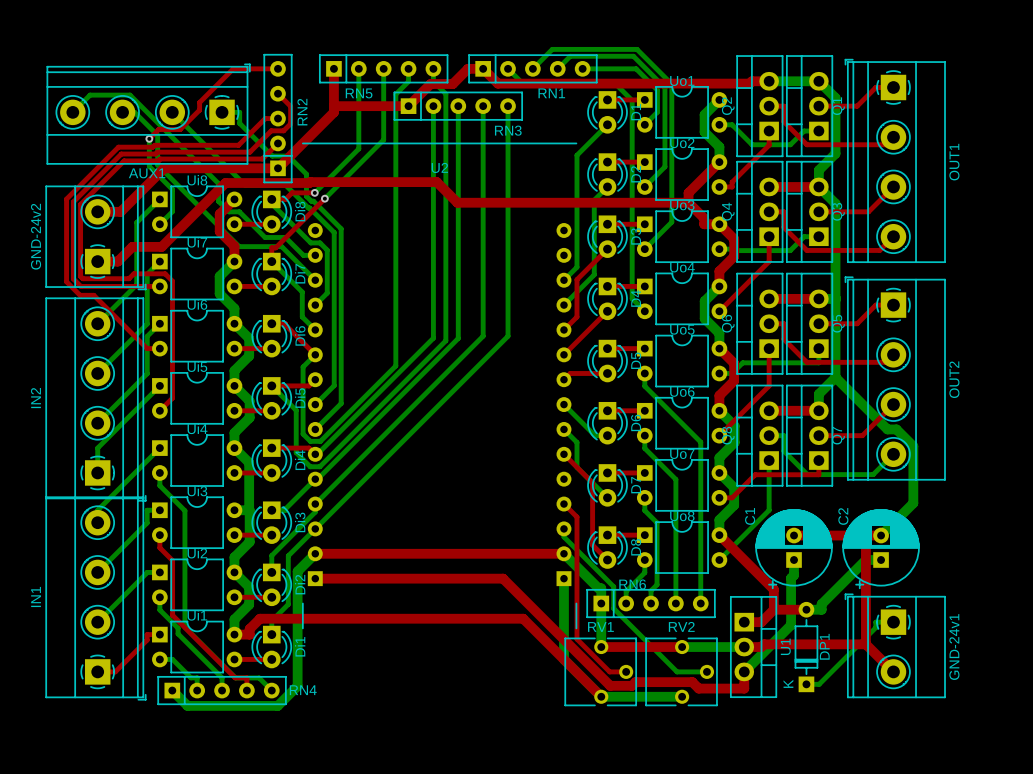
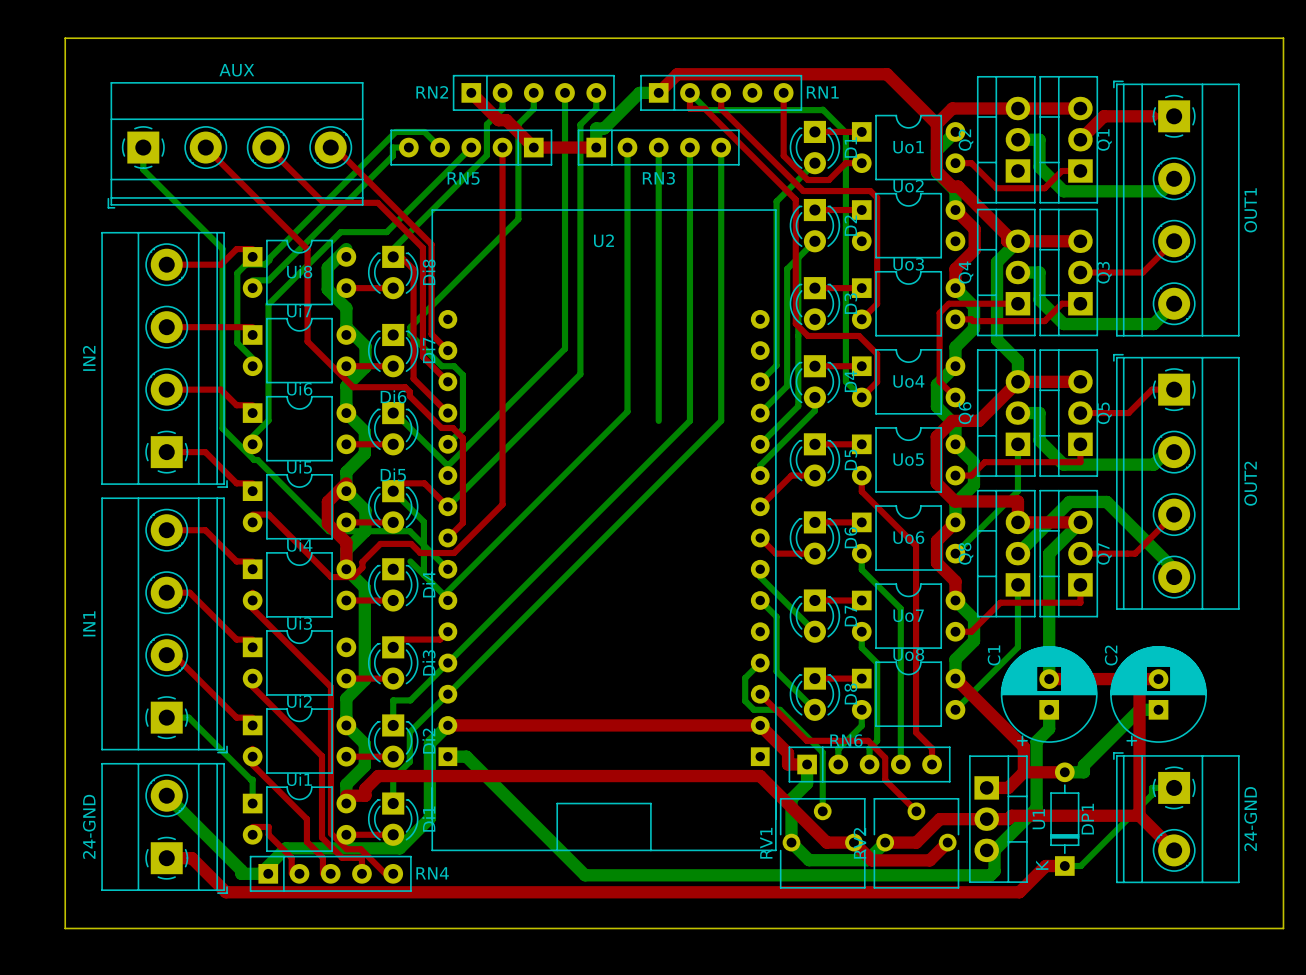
board edge: none -> (65, 38) (1283, 38) (1283, 928) (65, 928) (65, 38)
top track: (278, 68) (233, 68) (199, 102) (199, 110) (180, 129) (158, 129) (149, 138) -> none
top track: (333, 68) (333, 112) (278, 168) (164, 168) (120, 211) (97, 211) -> (471, 92) (498, 120) (506, 120) (533, 147) (596, 147)
bottom track: none -> (658, 92) (639, 92) (604, 128) (596, 128) (596, 139)
top track: none -> (658, 92) (677, 74) (887, 74) (936, 124)
top track: none -> (689, 92) (689, 108) (704, 108) (795, 199) (795, 323) (807, 335) (859, 335) (877, 354) (877, 382) (861, 397)
bottom track: (532, 68) (552, 49) (637, 49) (671, 84) (671, 222) (644, 249) -> none
top track: none -> (721, 92) (721, 108) (803, 191) (870, 191) (877, 197) (877, 303) (861, 319)
bottom track: (557, 68) (570, 56) (633, 56) (664, 87) (664, 166) (644, 186) -> none
bottom track: (582, 68) (636, 68) (657, 90) (657, 112) (644, 124) -> none
top track: none -> (783, 92) (783, 155) (807, 180) (828, 180) (845, 163) (861, 163)
Uo1 name position: Uo1 (682, 80) -> Uo1 (908, 147)
bottom track: (358, 81) (358, 148) (314, 192) -> (502, 108) (486, 124) (486, 155) (393, 249)
bottom track: (383, 81) (383, 139) (324, 198) -> (533, 108) (518, 124) (518, 219) (410, 327) (410, 334) (441, 366) (454, 366) (462, 375) (462, 429) (447, 444)
bottom track: (408, 81) (395, 94) (395, 365) (320, 441) (310, 441) (303, 434) (303, 367) (315, 354) -> (565, 108) (565, 348) (447, 465) (447, 475)
bottom track: (433, 81) (445, 94) (445, 340) (319, 466) (310, 466) -> (596, 108) (580, 124) (580, 374) (447, 506)
top track: (752, 81) (749, 83) (497, 83) (483, 68) (467, 68) (452, 84) (430, 84) (408, 106) (333, 106) -> (996, 108) (952, 108) (936, 124)
bottom track: (769, 81) (818, 81) (835, 97) (835, 153) (818, 170) (818, 186) (835, 203) (835, 298) -> none
top track: none -> (1017, 108) (1080, 108)
top track: (875, 87) (857, 106) (818, 106) -> (1152, 116) (1103, 116) (1080, 139)
top track: (278, 93) (290, 106) (290, 123) (283, 130) (271, 130) (249, 152) (121, 154) (73, 201) (73, 278) (80, 286) (159, 286) -> none
RN5 name position: RN5 (359, 93) -> RN5 (463, 178)
RN1 name position: RN1 (551, 93) -> RN1 (822, 92)
top track: none -> (936, 124) (936, 171) (952, 186) (958, 186) (1007, 235) (1007, 241) (1017, 241)
RN3 position: (458, 106) -> (658, 147)
bottom track: none -> (1017, 139) (1039, 139) (1039, 167) (1063, 191) (1161, 191) (1174, 178)
top track: (769, 106) (783, 106) (783, 121) (806, 144) (885, 144) (893, 137) -> none
AUX: none -> (235, 145)
bottom track: (72, 112) (90, 95) (130, 95) (218, 183) (218, 201) (229, 211) (239, 211) (265, 237) (285, 237) (303, 255) (315, 255) -> (143, 147) (143, 169) (222, 248) (222, 428) (254, 459) (257, 459) (328, 531) (409, 531) (447, 569)
bottom track: (122, 112) (134, 112) (157, 135) (157, 165) (239, 246) (281, 246) (315, 280) -> none
top track: none -> (205, 147) (307, 249) (307, 341) (353, 387) (405, 387) (409, 391) (409, 396) (441, 427) (452, 427) (462, 438) (462, 523) (447, 538)
bottom track: (172, 112) (245, 185) (285, 185) (334, 232) (334, 385) (315, 404) -> none
top track: none -> (268, 147) (323, 202) (377, 202) (422, 247) (422, 356) (447, 381)
bottom track: (222, 112) (239, 112) (239, 123) (272, 156) (288, 156) (306, 174) (306, 196) (341, 228) (341, 403) (315, 429) -> none
top track: none -> (330, 147) (334, 147) (431, 244) (431, 334) (447, 350)
bottom track: none -> (408, 147) (392, 147) (392, 156) (268, 280) (252, 280)
RN2 name position: RN2 (302, 112) -> RN2 (432, 92)
bottom track: none -> (440, 147) (424, 131) (395, 131) (265, 264) (245, 264) (237, 273) (237, 343) (252, 358)
bottom track: none -> (471, 147) (386, 232) (340, 232) (268, 304) (268, 420) (252, 436)
top track: none -> (502, 147) (502, 504) (454, 553) (420, 553) (411, 543) (380, 543) (362, 561) (362, 567) (353, 577) (331, 577) (268, 514) (252, 514)
bottom track: (433, 112) (433, 338) (315, 454) -> none
AUX1: (148, 114) -> none
top track: (278, 118) (265, 118) (238, 145) (118, 147) (66, 199) (66, 281) (80, 295) (93, 295) (147, 348) (159, 348) -> none
RN2 rotation: 0° (278, 118) -> 90° counterclockwise (471, 147)
bottom track: (719, 124) (732, 124) (752, 144) (790, 144) (804, 131) (818, 131) -> none
top track: none -> (955, 163) (971, 163) (996, 188) (1044, 188) (1061, 170) (1080, 170)
RN3 name position: RN3 (508, 130) -> RN3 (658, 178)
top track: (769, 131) (769, 145) (732, 182) (732, 186) (719, 186) -> none
bottom track: (149, 138) (149, 166) (172, 189) (172, 211) (159, 224) -> none
via: (149, 138) -> none
U2 footprint: [302, 142, 578, 629] -> [431, 209, 777, 852]
top track: (278, 143) (262, 159) (124, 160) (80, 204) (80, 276) (82, 278) (129, 278) (133, 273) (165, 273) (172, 281) (172, 398) (159, 410) -> none
top track: (719, 162) (688, 192) (688, 202) -> (955, 210) (974, 229) (974, 249) (955, 269) (955, 288)
Ui8 name position: Ui8 (197, 180) -> Ui8 (299, 271)
bottom track: none -> (1017, 241) (997, 262) (997, 339) (1017, 360) (1017, 381)
top track: (314, 192) (292, 192) (285, 199) (271, 199) -> none
via: (314, 192) -> none
top track: none -> (252, 249) (236, 249) (221, 264) (166, 264)
top track: none -> (393, 249) (413, 269) (413, 378) (447, 413)
top track: (324, 198) (275, 247) (271, 247) (271, 261) -> none
via: (324, 198) -> none
bottom track: (159, 199) (136, 222) (136, 284) (97, 323) -> none
top track: (234, 199) (219, 214) (219, 231) (234, 246) (234, 261) -> (346, 483) (327, 501) (327, 523) (346, 542) (346, 561)
bottom track: (271, 199) (271, 203) (310, 242) (320, 242) (327, 250) (327, 293) (315, 305) -> none
bottom track: none -> (798, 257) (787, 269) (787, 386) (760, 413)
top track: (688, 202) (457, 202) (436, 182) (225, 183) (161, 246) (132, 246) (117, 261) (97, 261) -> none
top track: (688, 202) (704, 218) (704, 224) (719, 224) (734, 239) (734, 256) (719, 271) (719, 286) -> none
bottom track: none -> (1017, 272) (1039, 272) (1039, 299) (1063, 324) (1153, 324) (1174, 303)
top track: (769, 211) (783, 211) (783, 227) (806, 250) (879, 250) (893, 236) -> none
bottom track: none -> (955, 288) (974, 306) (974, 328) (955, 347) (955, 366)
top track: (769, 236) (769, 261) (719, 311) -> (1017, 303) (948, 303) (939, 313) (939, 381) (955, 397)
bottom track: (818, 236) (804, 236) (790, 250) (719, 249) -> none
top track: none -> (1080, 303) (1061, 303) (1044, 321) (955, 319)
GND-24v2: (95, 237) -> none
top track: (607, 249) (576, 279) (576, 316) (563, 329) -> none
top track: none -> (166, 327) (252, 327)
bottom track: (159, 261) (147, 274) (147, 323) (97, 373) -> none
bottom track: (234, 261) (219, 276) (219, 293) (234, 308) -> (346, 249) (327, 267) (327, 289) (346, 308) (346, 327) (365, 346) (365, 367) (346, 386) (346, 394)
bottom track: (271, 261) (302, 292) (302, 316) (315, 329) -> none
bottom track: (576, 267) (563, 280) -> (776, 342) (776, 365) (760, 381)
Uo4 name position: Uo4 (682, 267) -> Uo4 (908, 381)
bottom track: (594, 274) (563, 305) -> (798, 351) (798, 406) (760, 444)
top track: none -> (1017, 381) (978, 420) (952, 420) (936, 436) (936, 483) (954, 501) (1017, 501) (1017, 522)
bottom track: (818, 298) (836, 298) (835, 377) -> none
top track: none -> (166, 389) (221, 389) (236, 405) (252, 405)
bottom track: none -> (814, 397) (814, 410) (760, 465) (760, 475)
top track: (607, 311) (563, 354) -> none
bottom track: none -> (393, 405) (393, 411) (447, 465)
bottom track: (458, 322) (458, 338) (285, 510) (271, 510) -> (627, 411) (444, 595)
bottom track: (159, 323) (147, 336) (147, 373) (97, 423) -> none
top track: (271, 323) (285, 323) (315, 354) -> none
bottom track: none -> (1017, 413) (1039, 413) (1039, 440) (1063, 464) (1153, 464) (1174, 444)
top track: (769, 323) (783, 323) (783, 339) (806, 362) (885, 362) (893, 354) -> none
bottom track: (483, 329) (483, 336) (315, 504) (315, 512) (271, 555) -> (689, 420) (410, 700) (393, 700) (393, 704)
bottom track: (508, 329) (508, 336) (288, 555) (288, 604) (271, 620) -> (721, 147) (721, 420) (409, 732) (409, 761) (393, 778) (393, 786)
Uo5 name position: Uo5 (682, 329) -> Uo5 (908, 459)
Di6 name rotation: 0° (300, 335) -> 90° clockwise (393, 396)
Di6 name position: Di6 (300, 335) -> Di6 (393, 396)
top track: (719, 348) (734, 363) (734, 380) (719, 395) (719, 410) -> (955, 600) (955, 581) (936, 562) (936, 540) (955, 522)
bottom track: none -> (1017, 444) (1017, 491) (955, 553)
top track: (769, 348) (769, 385) (719, 435) -> none
bottom track: (818, 348) (818, 362) (742, 362) (732, 373) (719, 373) -> none
top track: none -> (1080, 444) (1080, 462) (984, 462) (971, 475) (955, 475)
top track: none -> (166, 452) (205, 452) (236, 483) (252, 483)
top track: (588, 373) (570, 373) (563, 379) -> (791, 475) (760, 506)
bottom track: (644, 373) (644, 386) (700, 442) (700, 603) -> none
top track: none -> (861, 475) (861, 491) (916, 545) (916, 732) (932, 748) (932, 764)
bottom track: (835, 377) (818, 394) (818, 410) -> (1049, 679) (1049, 553) (1080, 522)
bottom track: (835, 377) (887, 429) (896, 429) (913, 446) (913, 503) (881, 535) -> none
top track: none -> (393, 483) (424, 483) (447, 506)
top track: (315, 379) (309, 385) (271, 385) -> (447, 631) (440, 639) (393, 639)
bottom track: (159, 385) (97, 448) (97, 472) -> none
Uo6 name position: Uo6 (682, 391) -> Uo6 (908, 537)
Di5 name rotation: 0° (300, 398) -> 90° clockwise (393, 474)
Di5 name position: Di5 (300, 398) -> Di5 (393, 474)
IN2 position: (95, 399) -> (164, 359)
bottom track: (563, 404) (595, 435) (607, 435) -> none
bottom track: (719, 410) (734, 425) (734, 442) (719, 457) (719, 472) -> (955, 522) (955, 503) (973, 484) (973, 462) (955, 444)
top track: none -> (166, 530) (205, 530) (236, 561) (252, 561)
top track: none -> (760, 538) (775, 553) (814, 553)
bottom track: (563, 429) (576, 442) (576, 467) -> (760, 569) (760, 577) (776, 593)
bottom track: (769, 435) (783, 435) (783, 451) (807, 474) (873, 474) (893, 454) -> (1017, 553) (1069, 501) (1106, 501) (1174, 569)
bottom track: (159, 448) (97, 510) (97, 522) -> none
top track: (271, 448) (309, 448) (315, 454) -> none
top track: (563, 454) (592, 482) (592, 545) (607, 560) -> none
Uo7 name position: Uo7 (682, 454) -> Uo7 (908, 615)
top track: none -> (166, 592) (189, 592) (236, 639) (252, 639)
top track: none -> (252, 592) (252, 608) (330, 687) (330, 833) (346, 849) (360, 849) (385, 873)
bottom track: (159, 472) (159, 485) (184, 510) (184, 627) (235, 677) (259, 677) (271, 690) -> none
bottom track: none -> (760, 600) (776, 616) (776, 671) (814, 709)
top track: (563, 504) (576, 517) (576, 639) (609, 671) (626, 671) -> none
bottom track: (159, 510) (147, 510) (147, 522) (97, 572) -> none
bottom track: (234, 510) (249, 510) (249, 542) (234, 557) -> (364, 647) (364, 680) (346, 698) (346, 706)
top track: none -> (166, 655) (174, 655) (236, 717) (252, 717)
bottom track: none -> (760, 662) (745, 678) (745, 701) (753, 709) (780, 709) (822, 752) (822, 811)
bottom track: (563, 528) (563, 536) (613, 586) (613, 608) (677, 671) (706, 671) -> none
top track: (159, 541) (159, 547) (172, 560) (172, 615) (235, 677) -> (252, 686) (322, 756) (322, 837) (342, 857) (347, 857)
top track: none -> (760, 694) (806, 740) (868, 740) (885, 757) (885, 780) (916, 811)
bottom track: (315, 553) (297, 571) (297, 686) (277, 705) (187, 705) (172, 690) -> none
top track: (315, 553) (563, 553) -> none
bottom track: (563, 553) (598, 588) (601, 588) (601, 603) -> none
bottom track: none -> (166, 717) (188, 717) (252, 779) (252, 795)
bottom track: (159, 572) (147, 572) (97, 622) -> none
bottom track: none -> (447, 725) (429, 743) (429, 818) (399, 848) (285, 848) (260, 873) (241, 873) (241, 870) (166, 795)
top track: none -> (447, 725) (760, 725) (788, 753) (788, 764) (807, 764)
top track: (315, 578) (503, 578) (610, 685) (632, 685) (635, 682) (692, 682) (698, 688) (744, 688) (744, 671) -> none
bottom track: (563, 578) (563, 659) (601, 696) (682, 696) -> none
bottom track: (791, 578) (791, 625) (744, 671) -> (1045, 732) (1036, 741) (1036, 808) (994, 850) (994, 871) (990, 875) (585, 875) (466, 756) (447, 756)
top track: none -> (252, 748) (252, 764) (306, 819) (306, 841) (322, 857) (322, 873)
bottom track: (159, 597) (159, 610) (178, 628) (178, 633) (222, 677) (222, 690) -> none
IN1 position: (95, 598) -> (164, 625)
bottom track: (601, 618) (601, 647) -> (807, 783) (791, 799) (791, 842) (809, 860) (867, 860) (885, 842)
top track: none -> (346, 795) (365, 795) (365, 788) (378, 776) (760, 776) (826, 842) (853, 842) (871, 860) (929, 860) (947, 842)
top track: (159, 634) (147, 634) (147, 640) (115, 671) (97, 671) -> none
top track: (234, 634) (249, 634) (249, 629) (260, 618) (523, 618) (601, 696) -> none
top track: (601, 647) (682, 647) -> none
bottom track: (682, 647) (744, 647) -> none
top track: none -> (986, 819) (939, 819) (916, 842) (885, 842)
GND-24v1 name: GND-24v1 (954, 647) -> 24-GND (1250, 819)
top track: none -> (252, 826) (268, 826) (268, 834) (291, 857) (291, 873)
24-GND: none -> (164, 828)
bottom track: (159, 659) (172, 659) (190, 677) (197, 677) (197, 690) -> none
RV1 rotation: 0° (600, 671) -> 90° counterclockwise (822, 843)
RV2 rotation: 0° (681, 671) -> 90° counterclockwise (916, 843)
top track: none -> (166, 858) (191, 858) (226, 892) (1019, 892) (1045, 866) (1064, 866)

